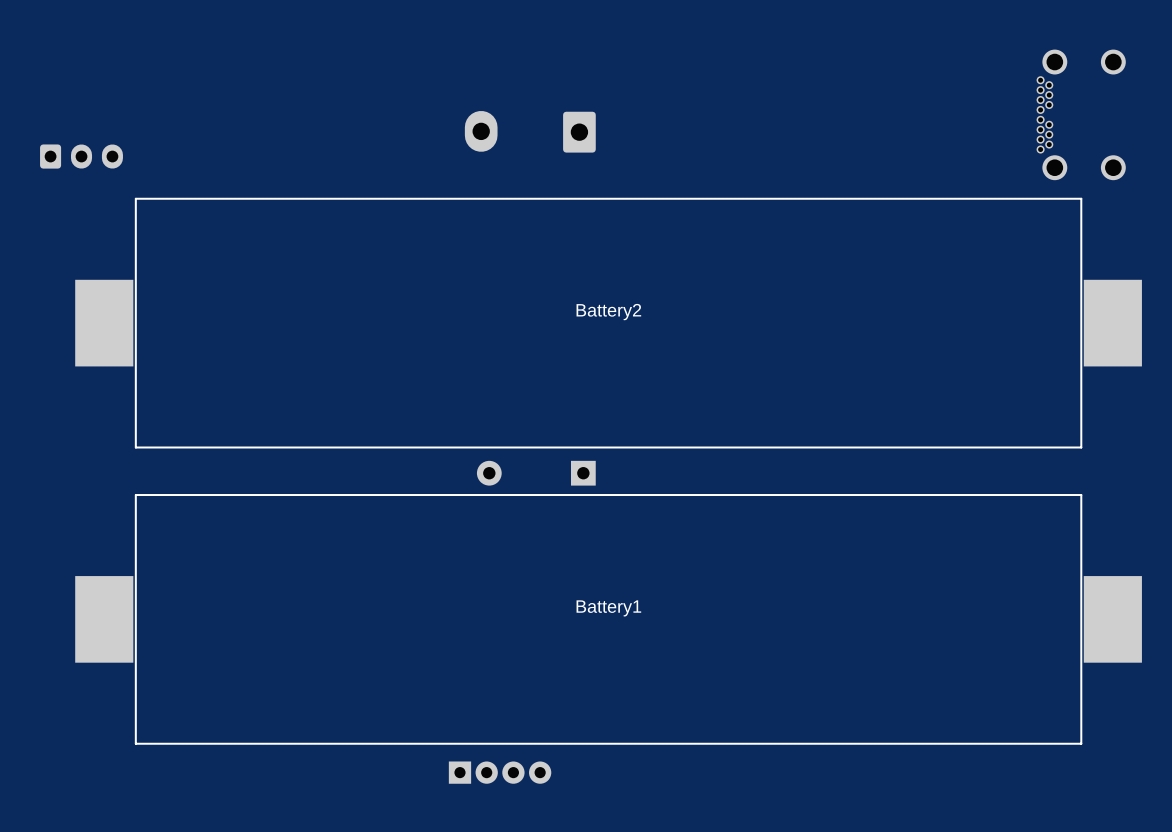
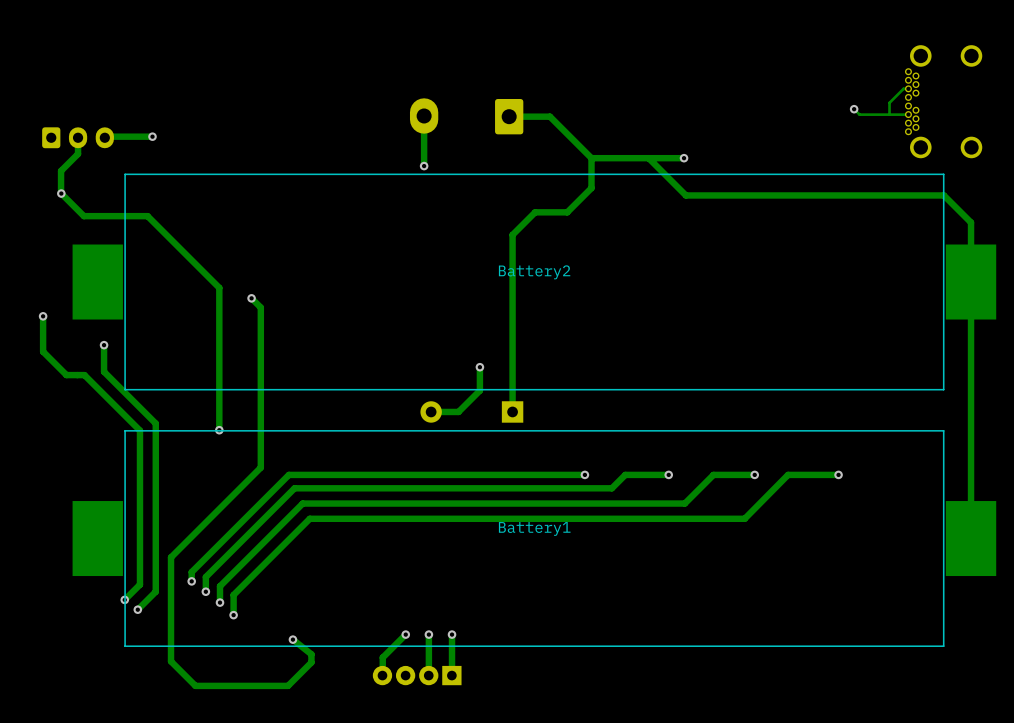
track: none -> (908, 88) (903, 88) (889, 102) (889, 114)
track: none -> (854, 109) (859, 114) (906, 114)
via: none -> (854, 109)
track: none -> (424, 115) (424, 166)
track: none -> (509, 116) (550, 116) (591, 158)
track: none -> (152, 136) (104, 137)
via: none -> (152, 136)
track: none -> (78, 137) (78, 153) (61, 170) (61, 193) (83, 216) (147, 216) (219, 287) (219, 430)
track: none -> (591, 158) (591, 188) (567, 212) (535, 212) (512, 234) (512, 411)
track: none -> (648, 158) (685, 195) (943, 195) (971, 222) (971, 538)
track: none -> (684, 158) (591, 158)
via: none -> (684, 158)
via: none -> (424, 166)
via: none -> (61, 193)
track: none -> (251, 298) (260, 307) (260, 467) (171, 557) (171, 661) (195, 685) (288, 685) (311, 662) (311, 654) (292, 639)
via: none -> (251, 298)
track: none -> (43, 316) (43, 351) (66, 375) (84, 375) (139, 430) (139, 584) (125, 599)
via: none -> (43, 316)
track: none -> (104, 345) (104, 371) (155, 423) (155, 591) (137, 609)
via: none -> (104, 345)
track: none -> (479, 367) (479, 390) (458, 411) (431, 411)
via: none -> (479, 367)
via: none -> (219, 430)
track: none -> (584, 474) (288, 474) (191, 572) (191, 581)
via: none -> (584, 474)
track: none -> (668, 474) (625, 474) (611, 488) (294, 488) (205, 577) (205, 591)
via: none -> (668, 474)
track: none -> (754, 474) (713, 474) (684, 503) (302, 503) (220, 586) (220, 602)
via: none -> (754, 474)
track: none -> (838, 474) (788, 474) (744, 518) (309, 518) (233, 594) (233, 615)
via: none -> (838, 474)
via: none -> (191, 581)
via: none -> (205, 591)
via: none -> (124, 599)
via: none -> (220, 602)
via: none -> (137, 609)
via: none -> (233, 615)
track: none -> (405, 634) (382, 657) (382, 675)
via: none -> (405, 634)
track: none -> (428, 634) (428, 675)
via: none -> (428, 634)
track: none -> (452, 634) (452, 675)
via: none -> (452, 634)
via: none -> (292, 639)
part rotation: 0° (500, 772) -> 180° (417, 675)

